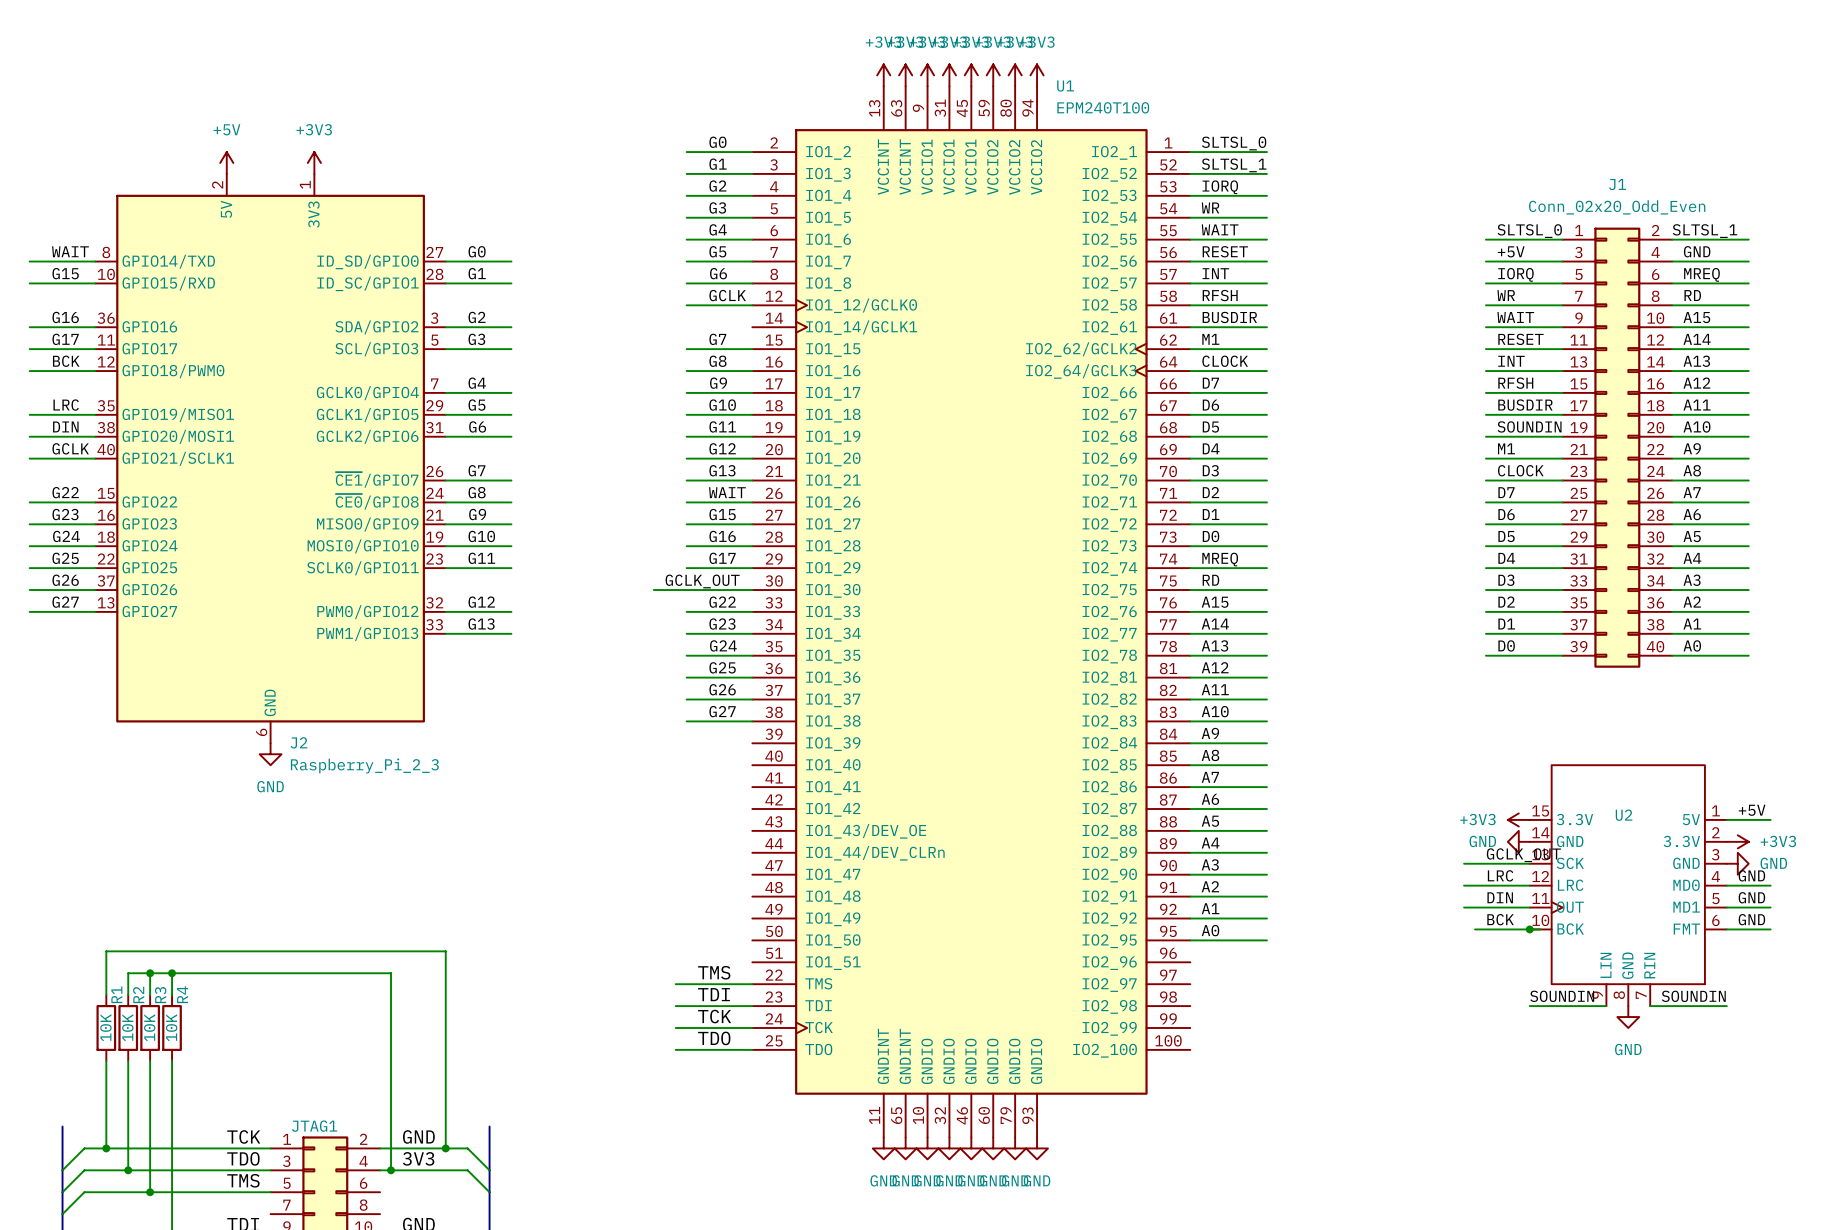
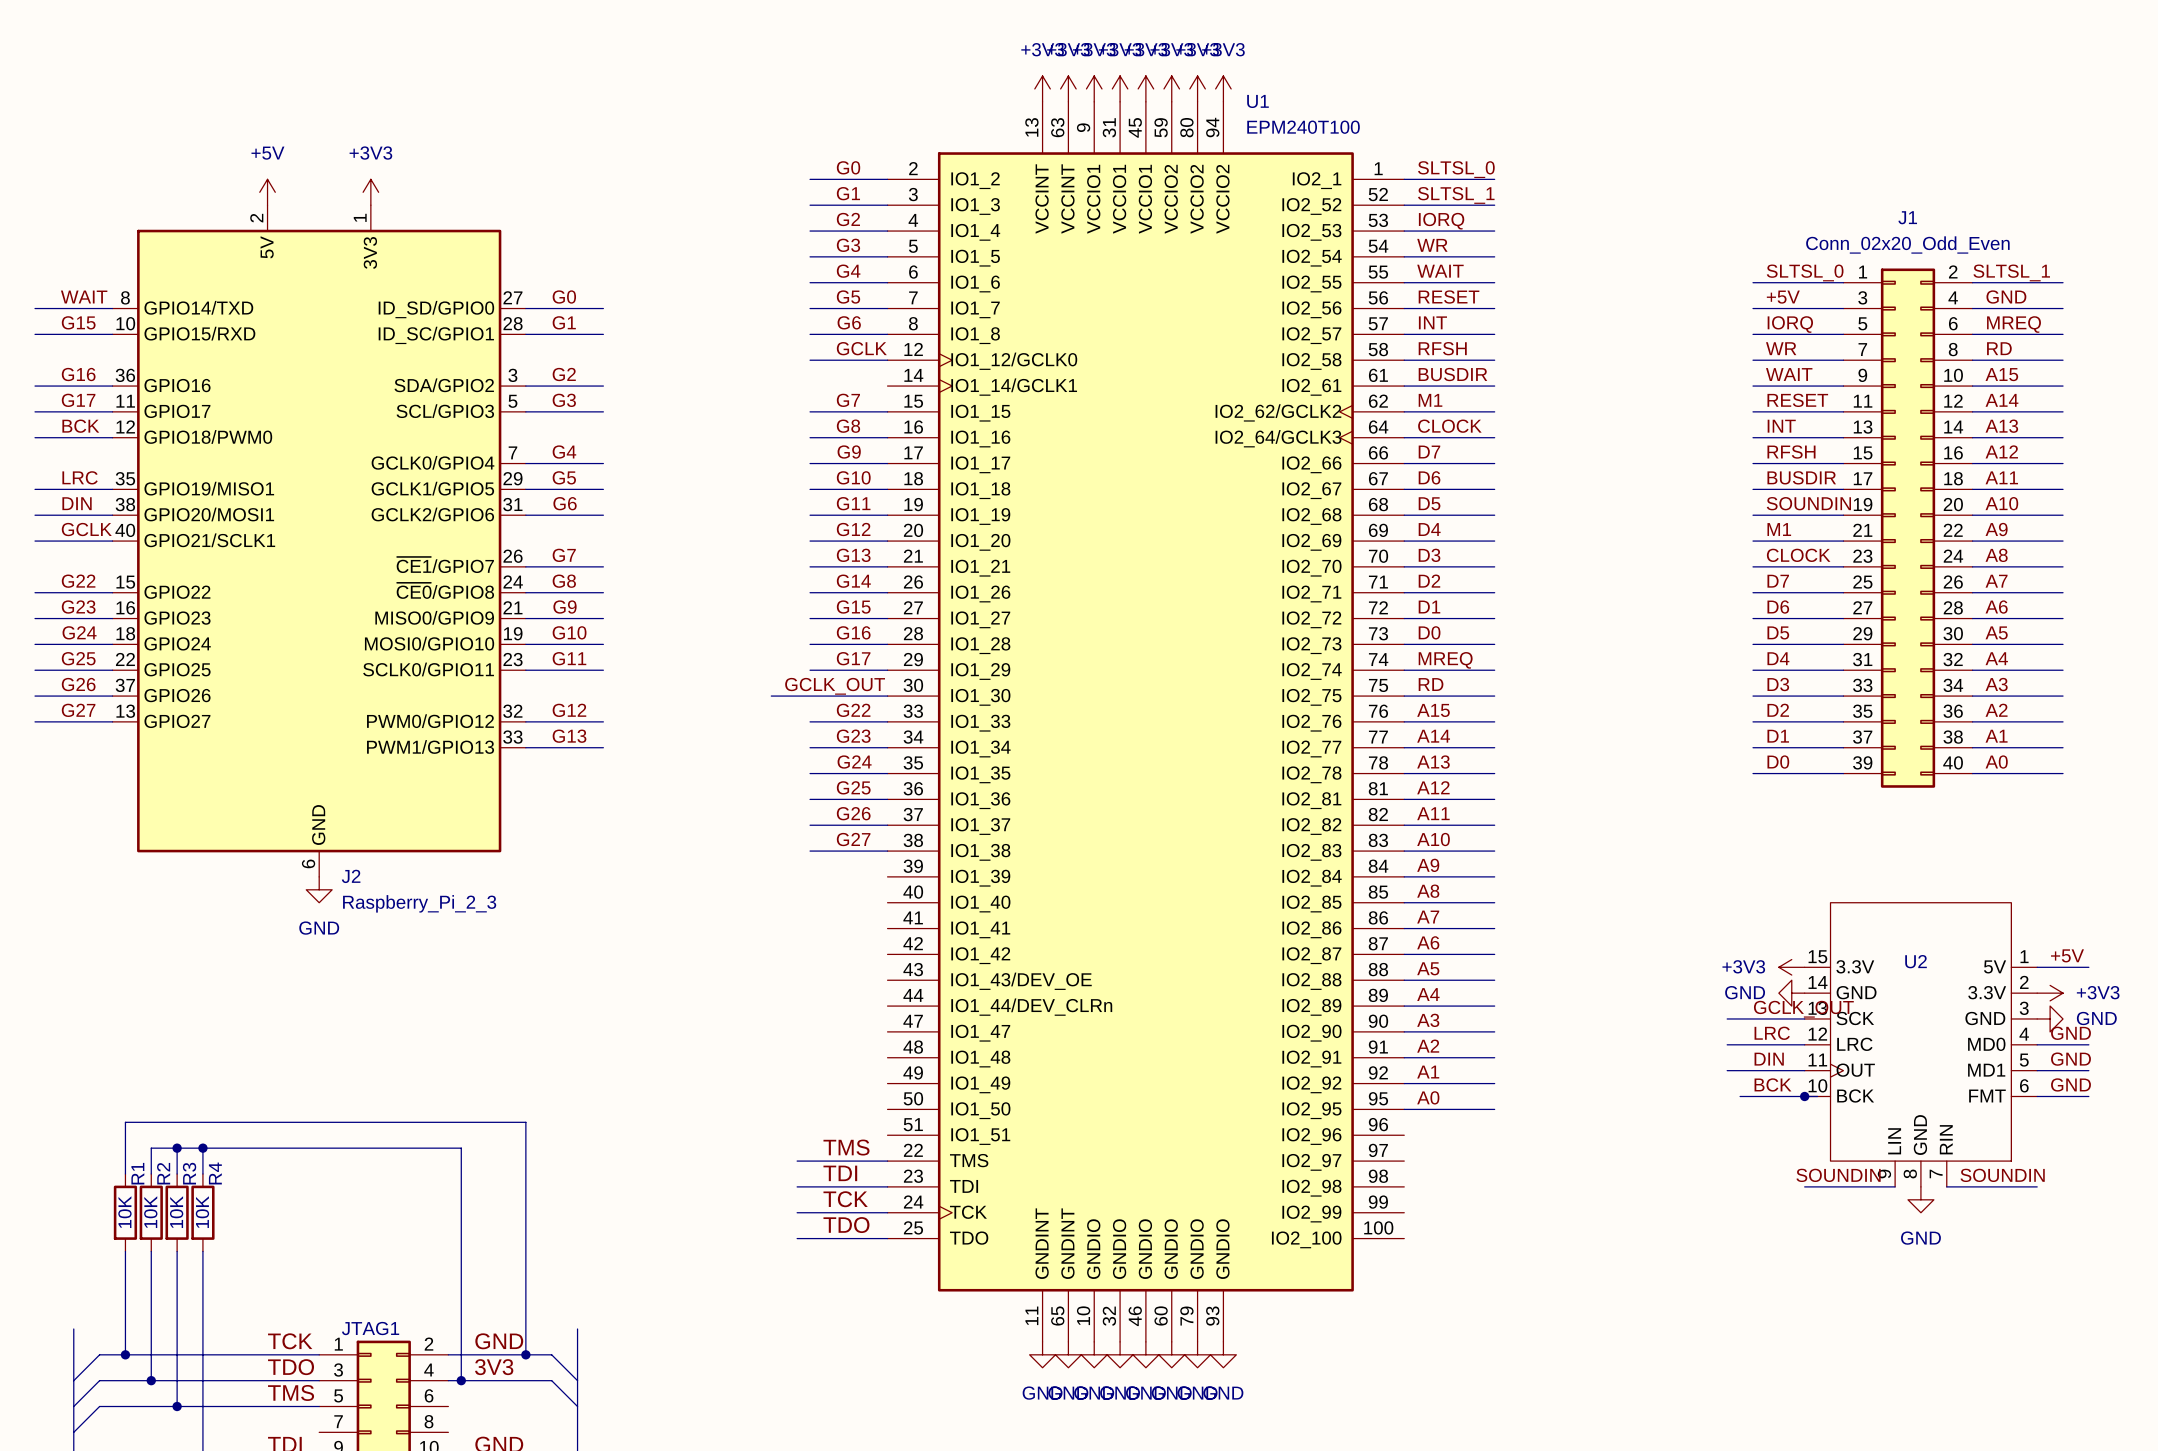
label: WAIT (727, 492) -> G14 (853, 581)

